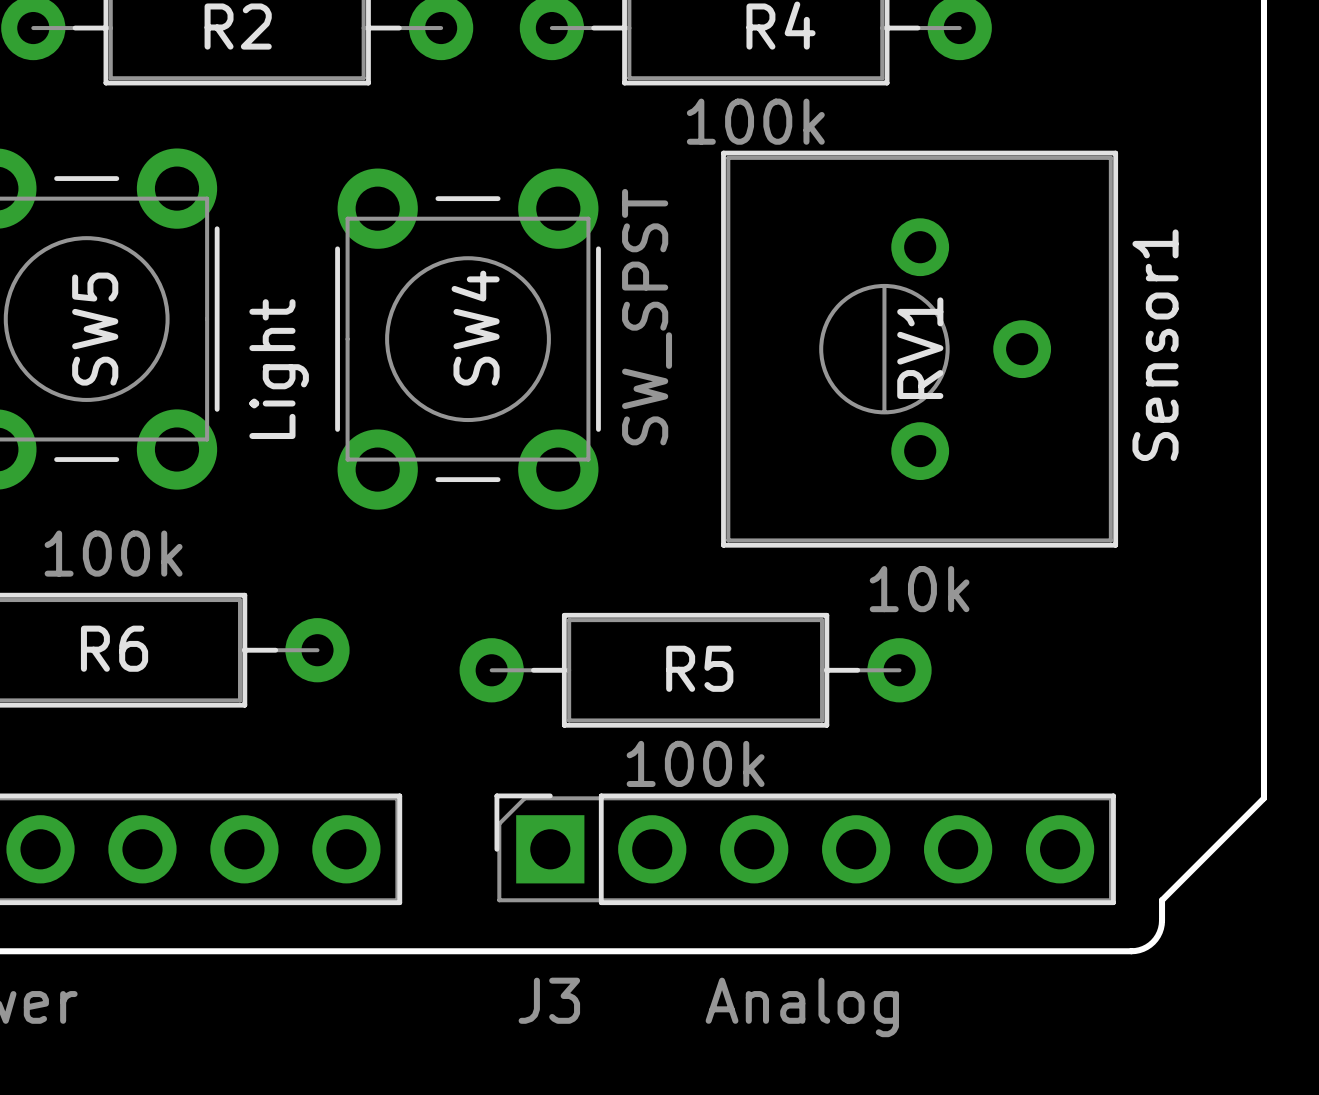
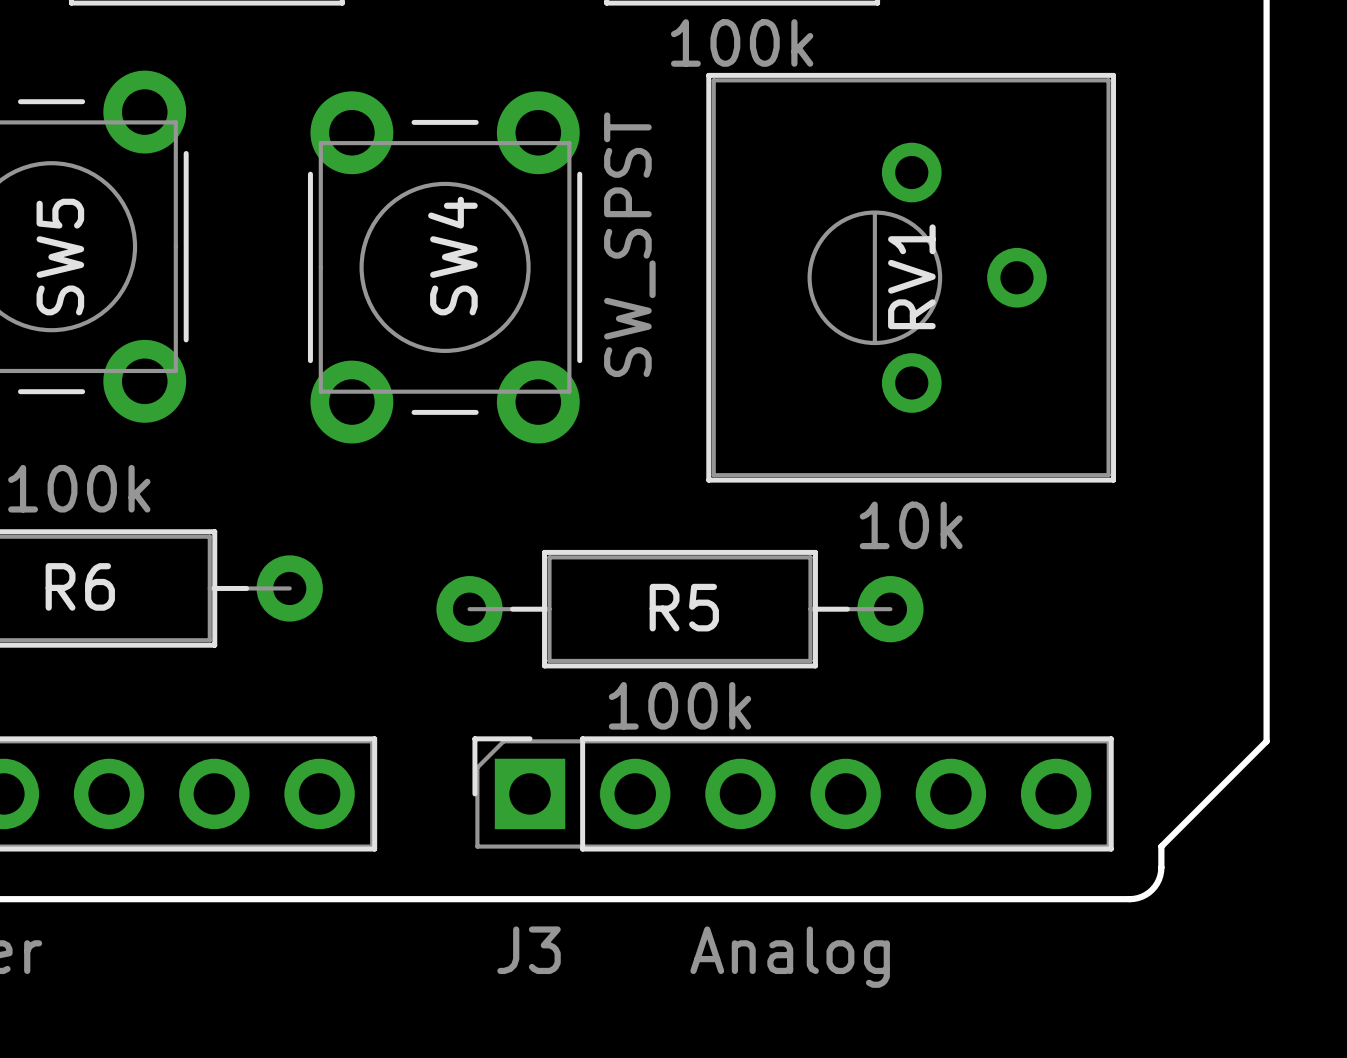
text: Sensor1 (1155, 345) -> none
text: Light (279, 369) -> none

